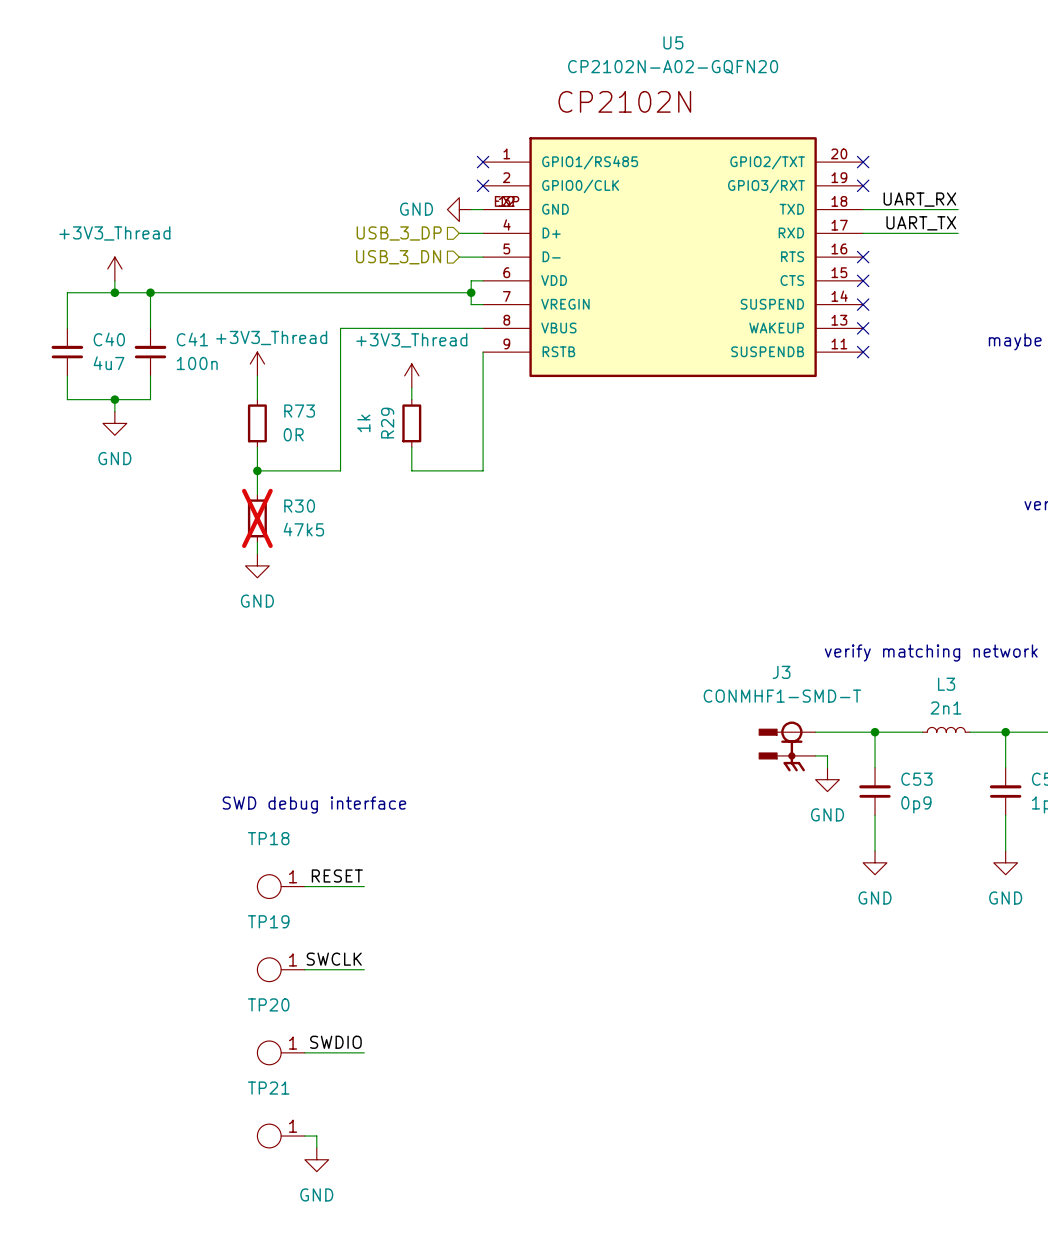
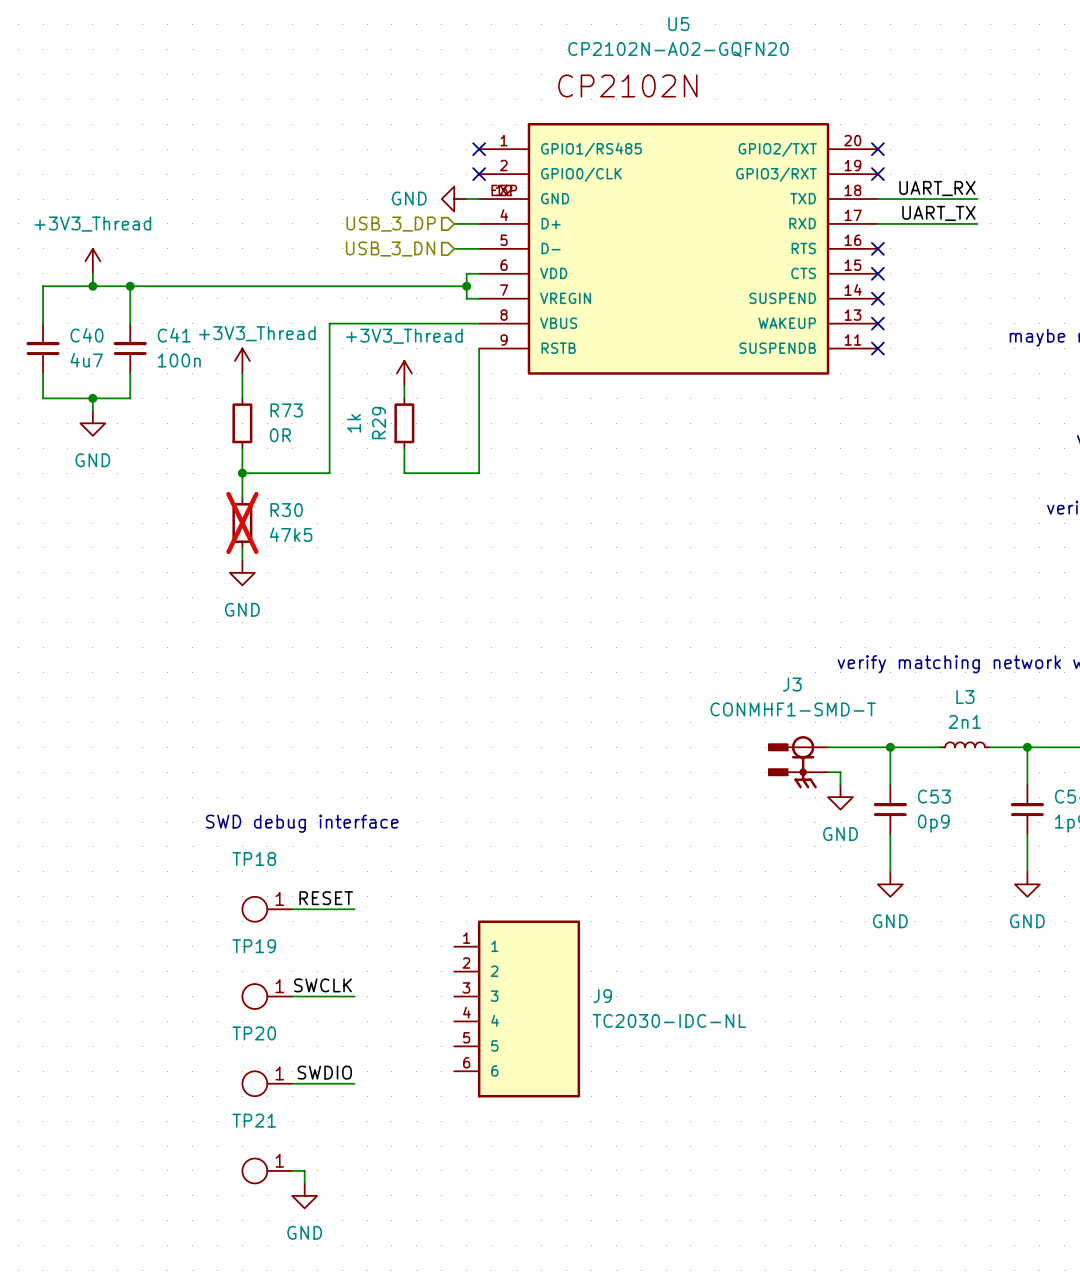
J9: none -> TC2030-IDC-NL (517, 1008)

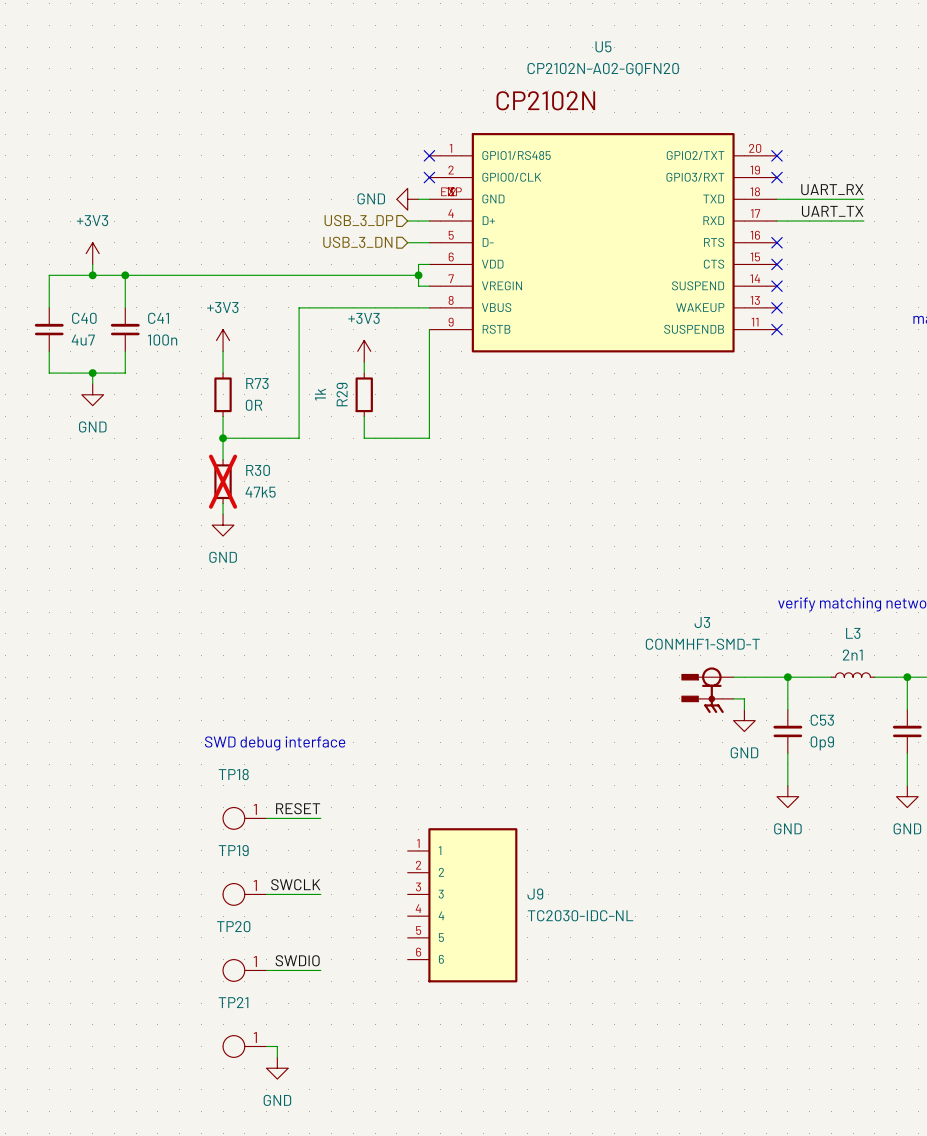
power symbol: +3V3_Thread (92, 261) -> +3V3 (92, 253)
power symbol: +3V3_Thread (242, 361) -> +3V3 (223, 340)
power symbol: +3V3_Thread (404, 373) -> +3V3 (364, 351)

